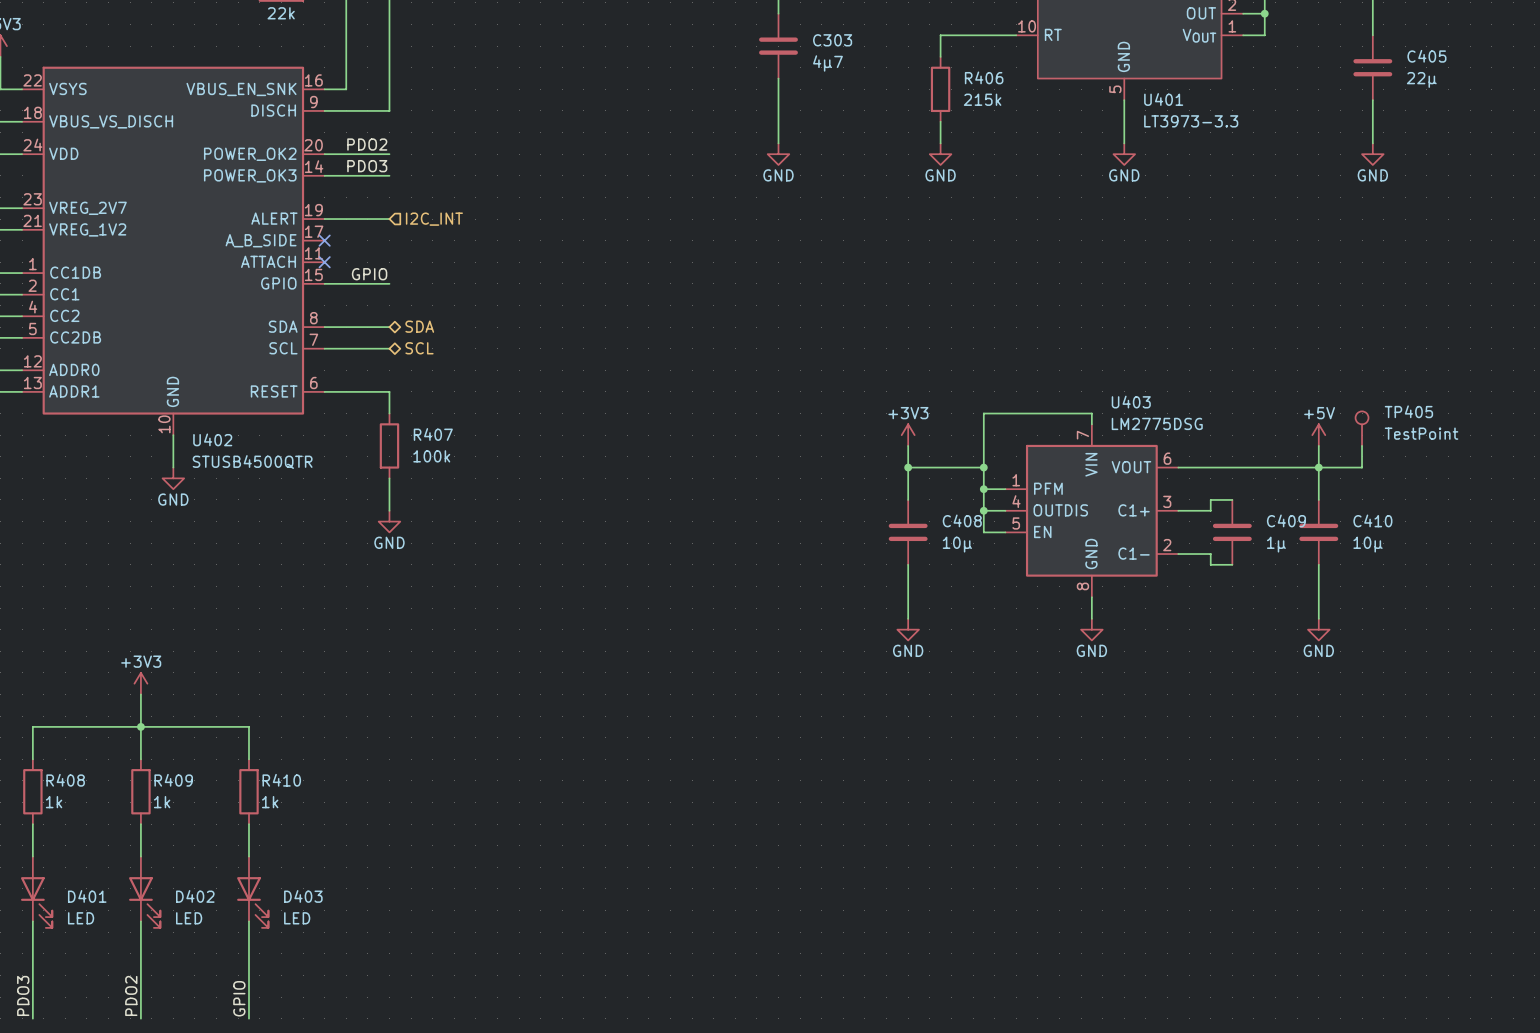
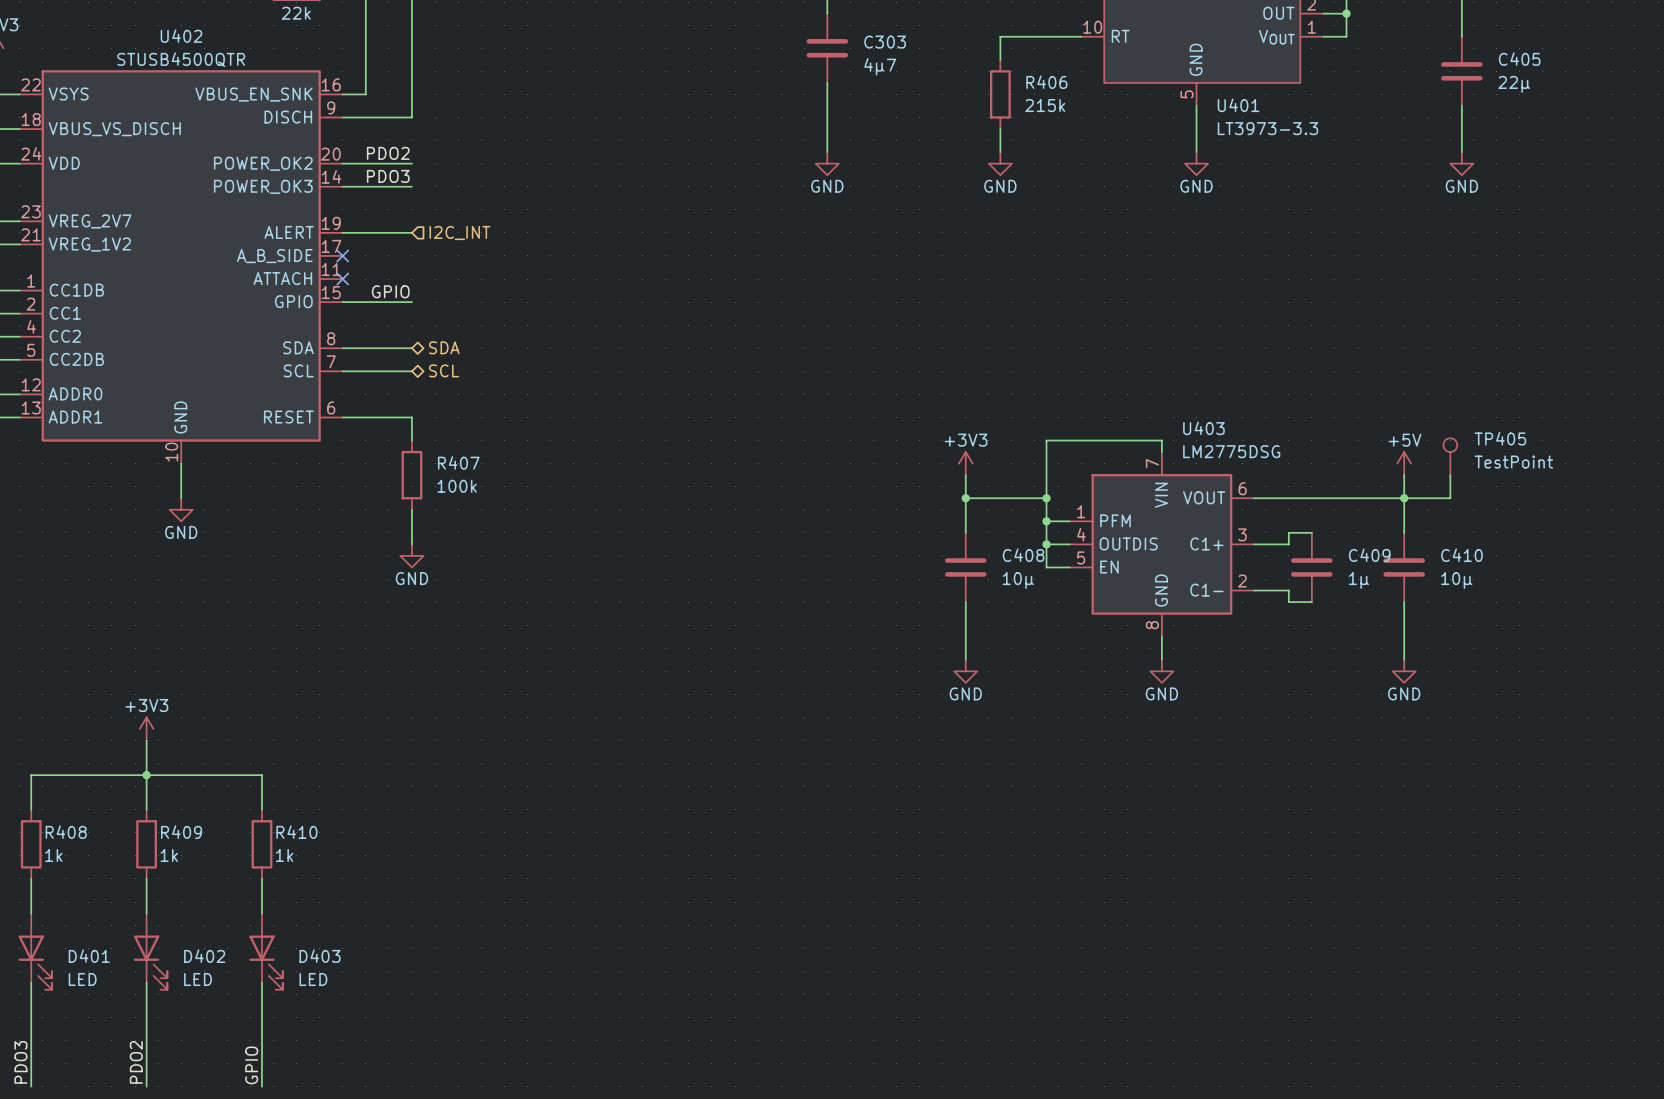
U402 name position: U402 (212, 439) -> U402 (181, 36)
U402 value position: STUSB4500QTR (252, 462) -> STUSB4500QTR (181, 59)

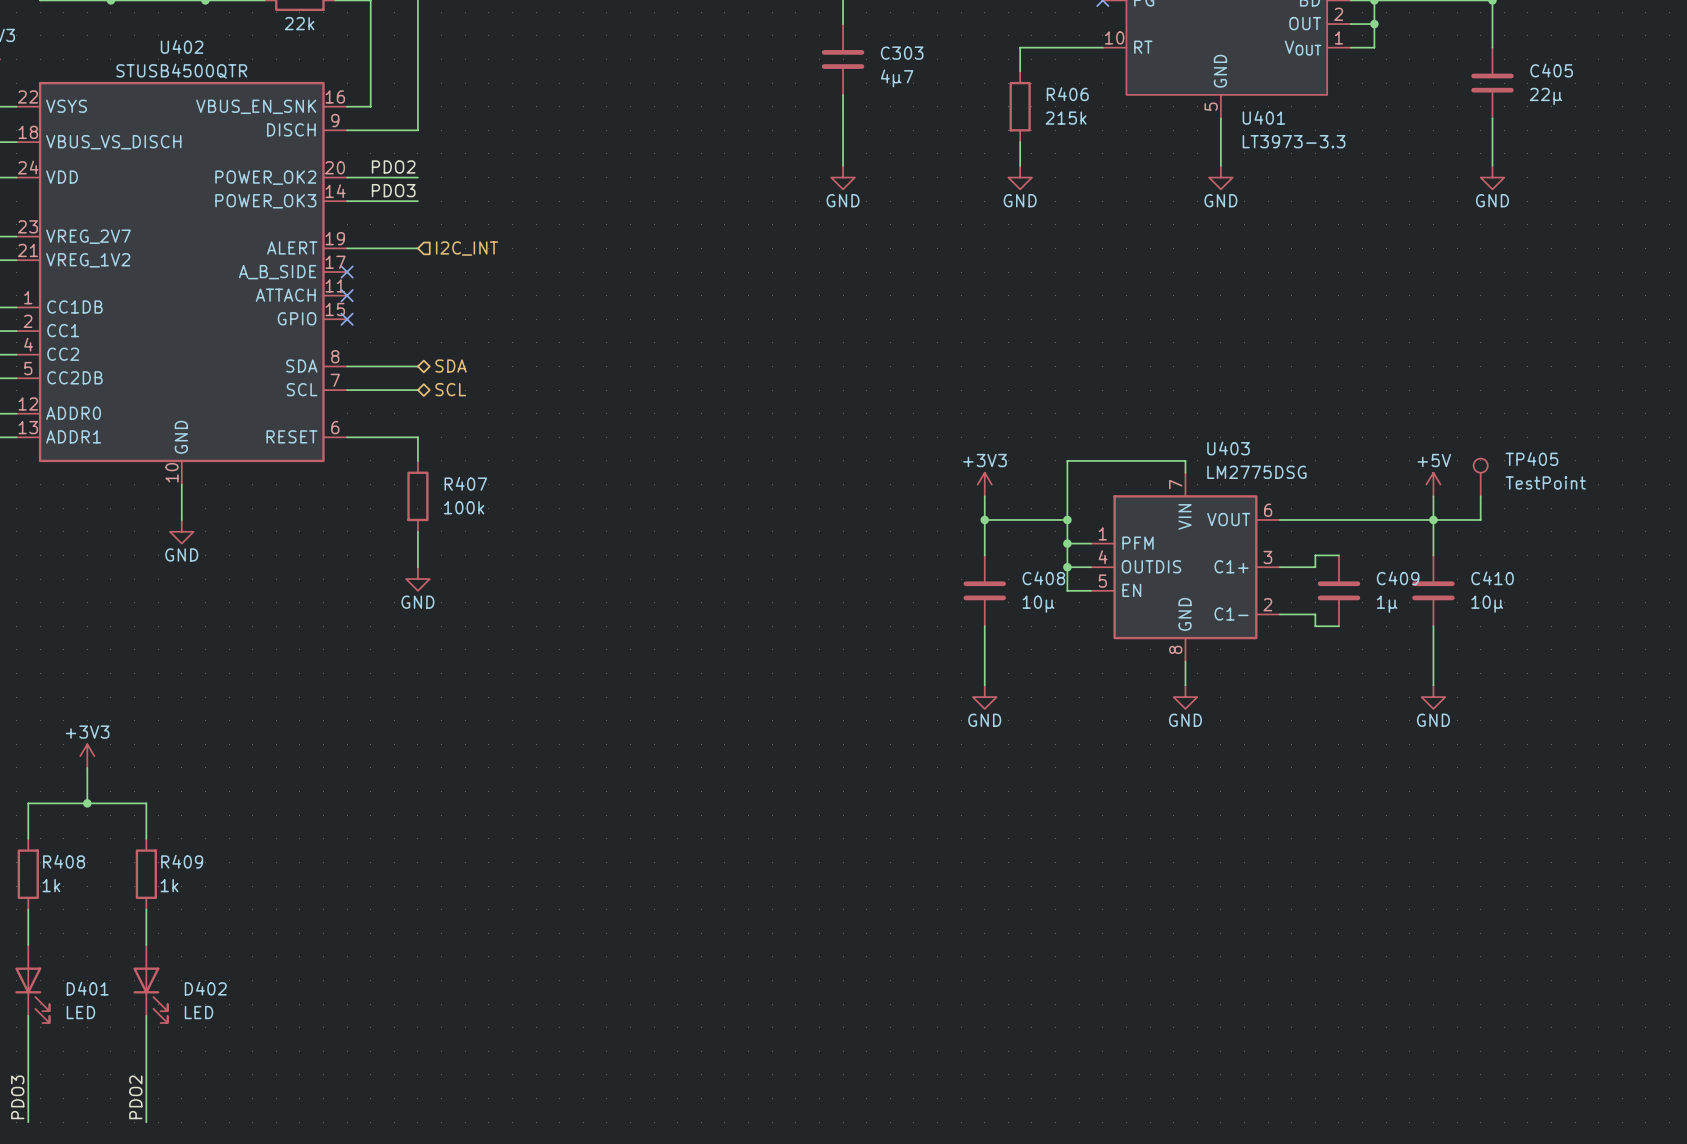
label: GPIO (390, 291) -> none
wire: (342, 302) (411, 302) -> none
no-connect mark: none -> (347, 319)
power symbol position: +3V3 (146, 728) -> +3V3 (87, 756)
wire: (146, 740) (146, 775) (261, 775) (261, 809) -> none
junction: none -> (87, 803)
junction: (146, 775) -> none
R410: 1k (261, 844) -> none
wire: (261, 878) (261, 913) -> (87, 767) (87, 803)
D403: LED (266, 951) -> none
wire: (261, 982) (261, 1086) -> none
label: GPIO (251, 1065) -> none

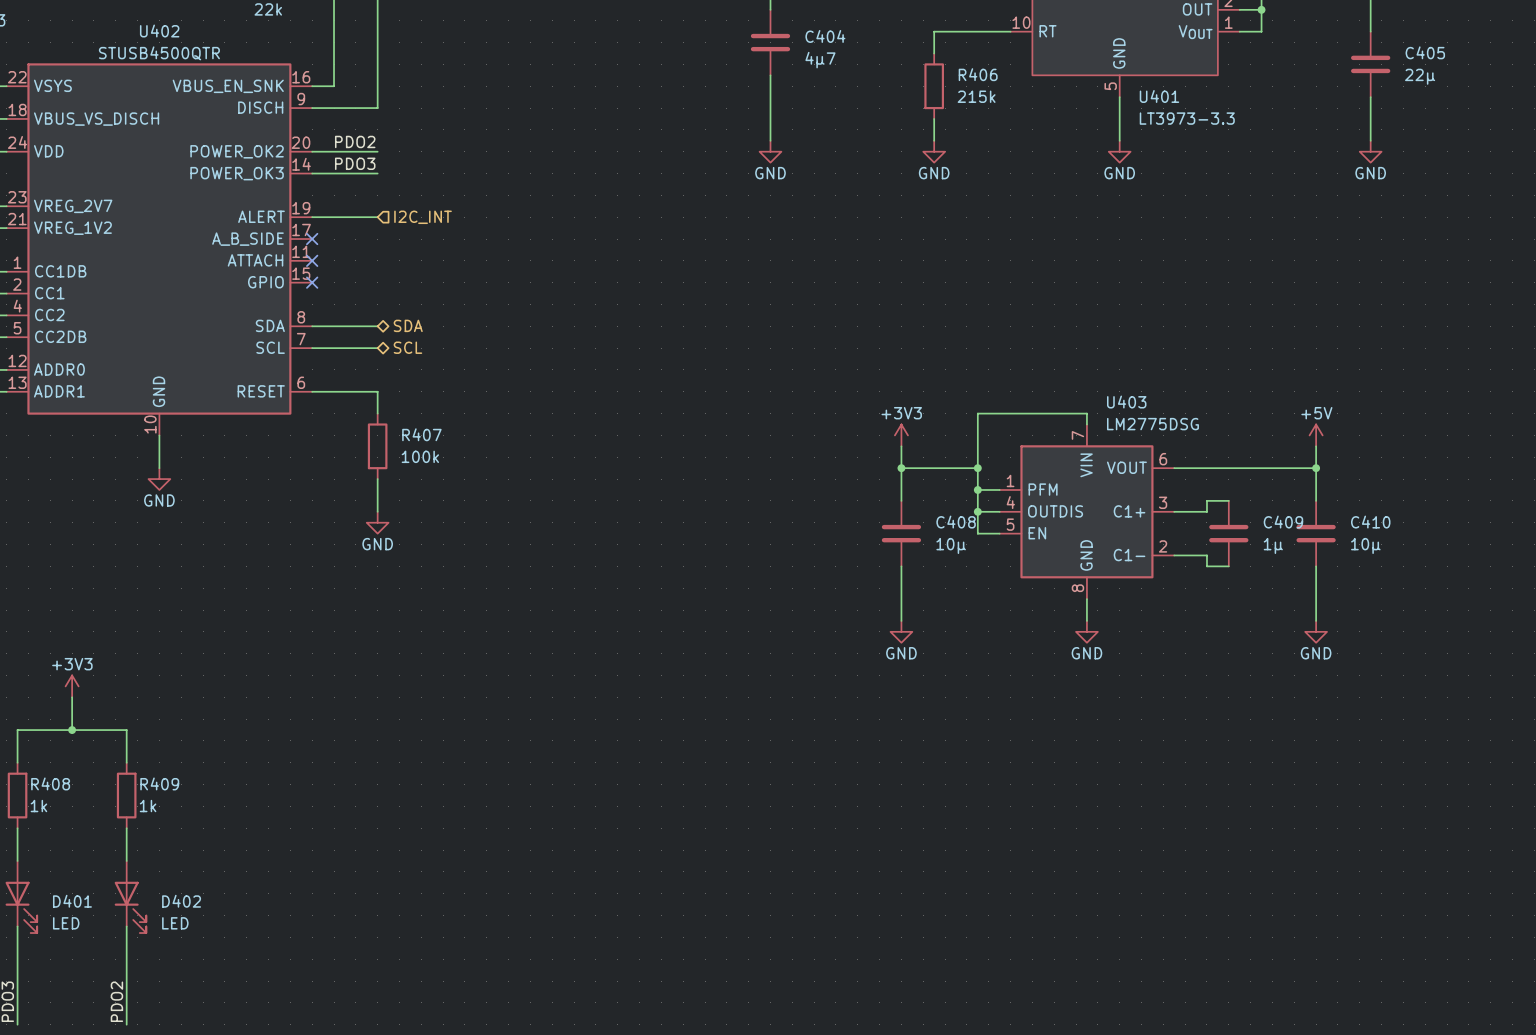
C303 name: C303 (902, 53) -> C404 (825, 36)
TP405: TestPoint (1480, 477) -> none
wire: (1480, 496) (1480, 519) (1433, 519) -> none

